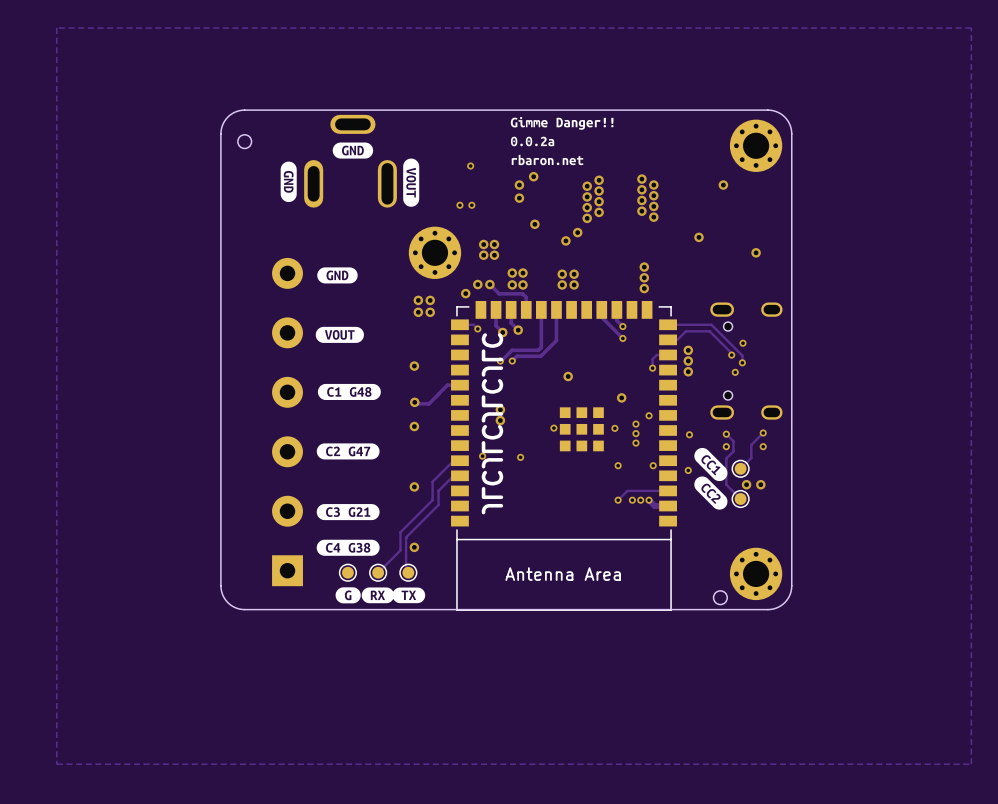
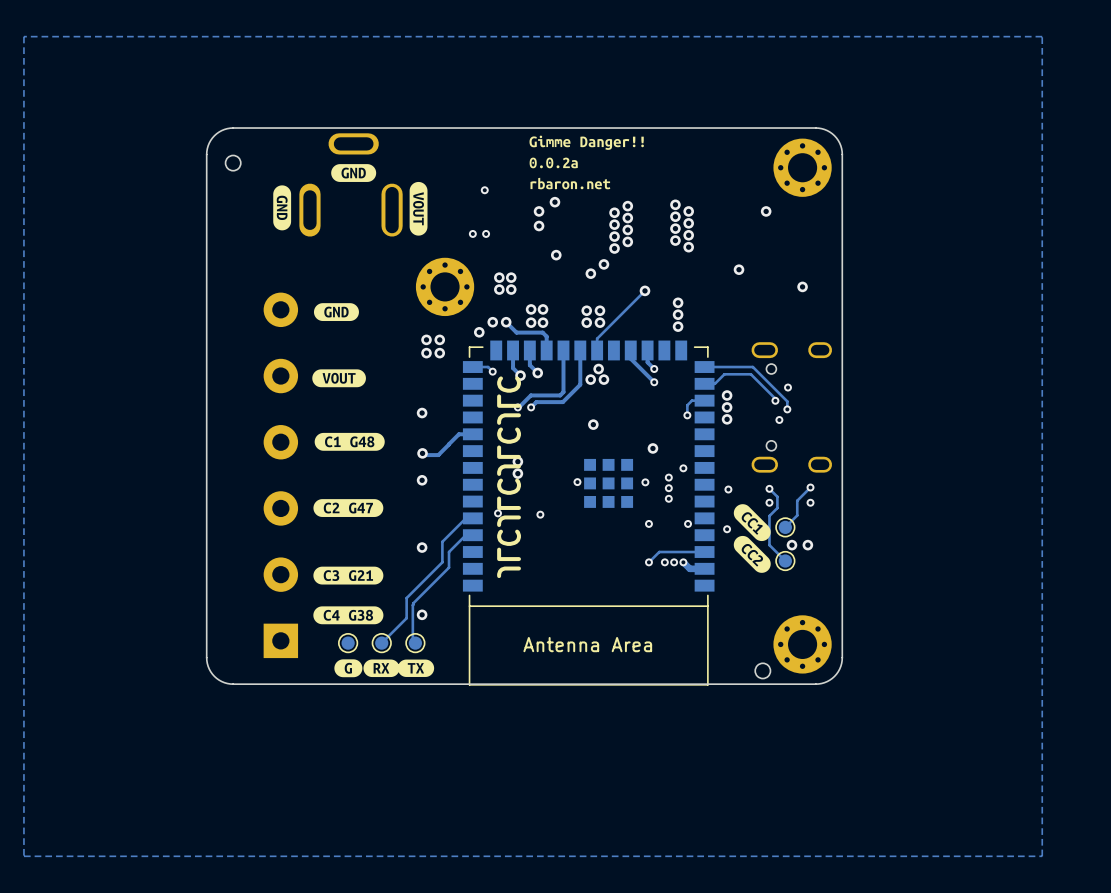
track: none -> (644, 290) (597, 338) (597, 350)
via: none -> (644, 290)
via: none -> (598, 369)
via: none -> (590, 379)
via: none -> (603, 379)

